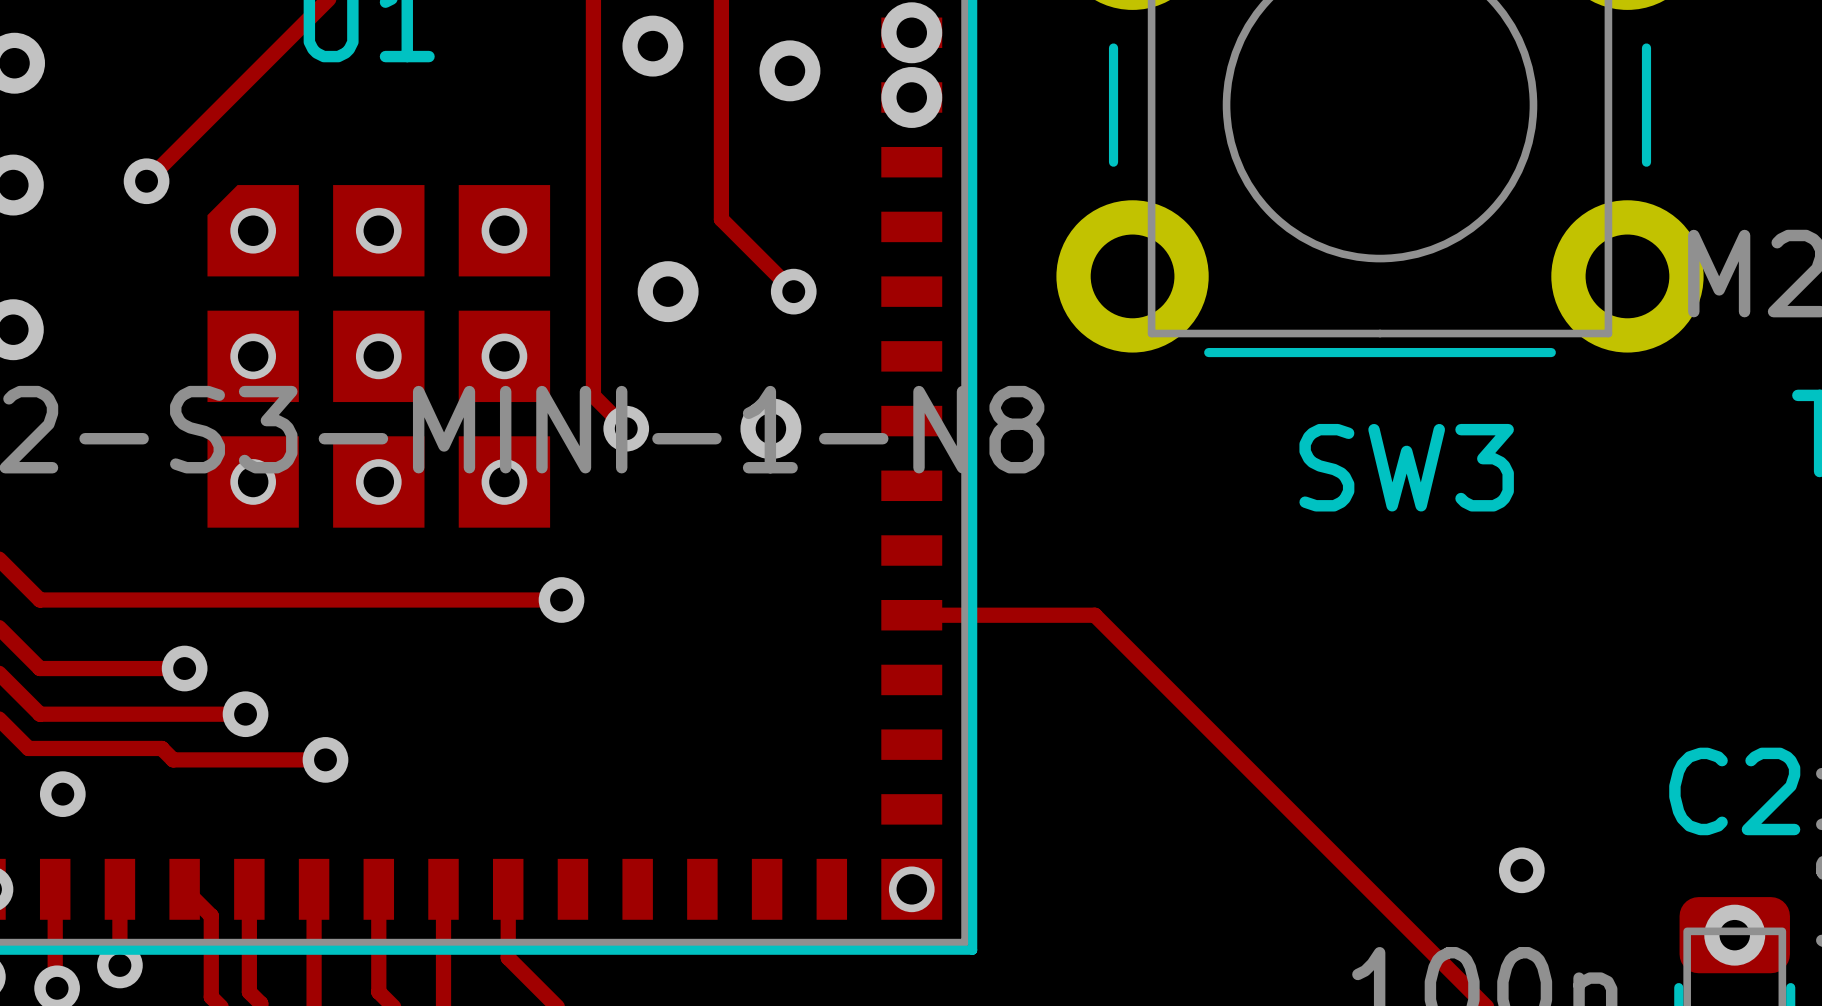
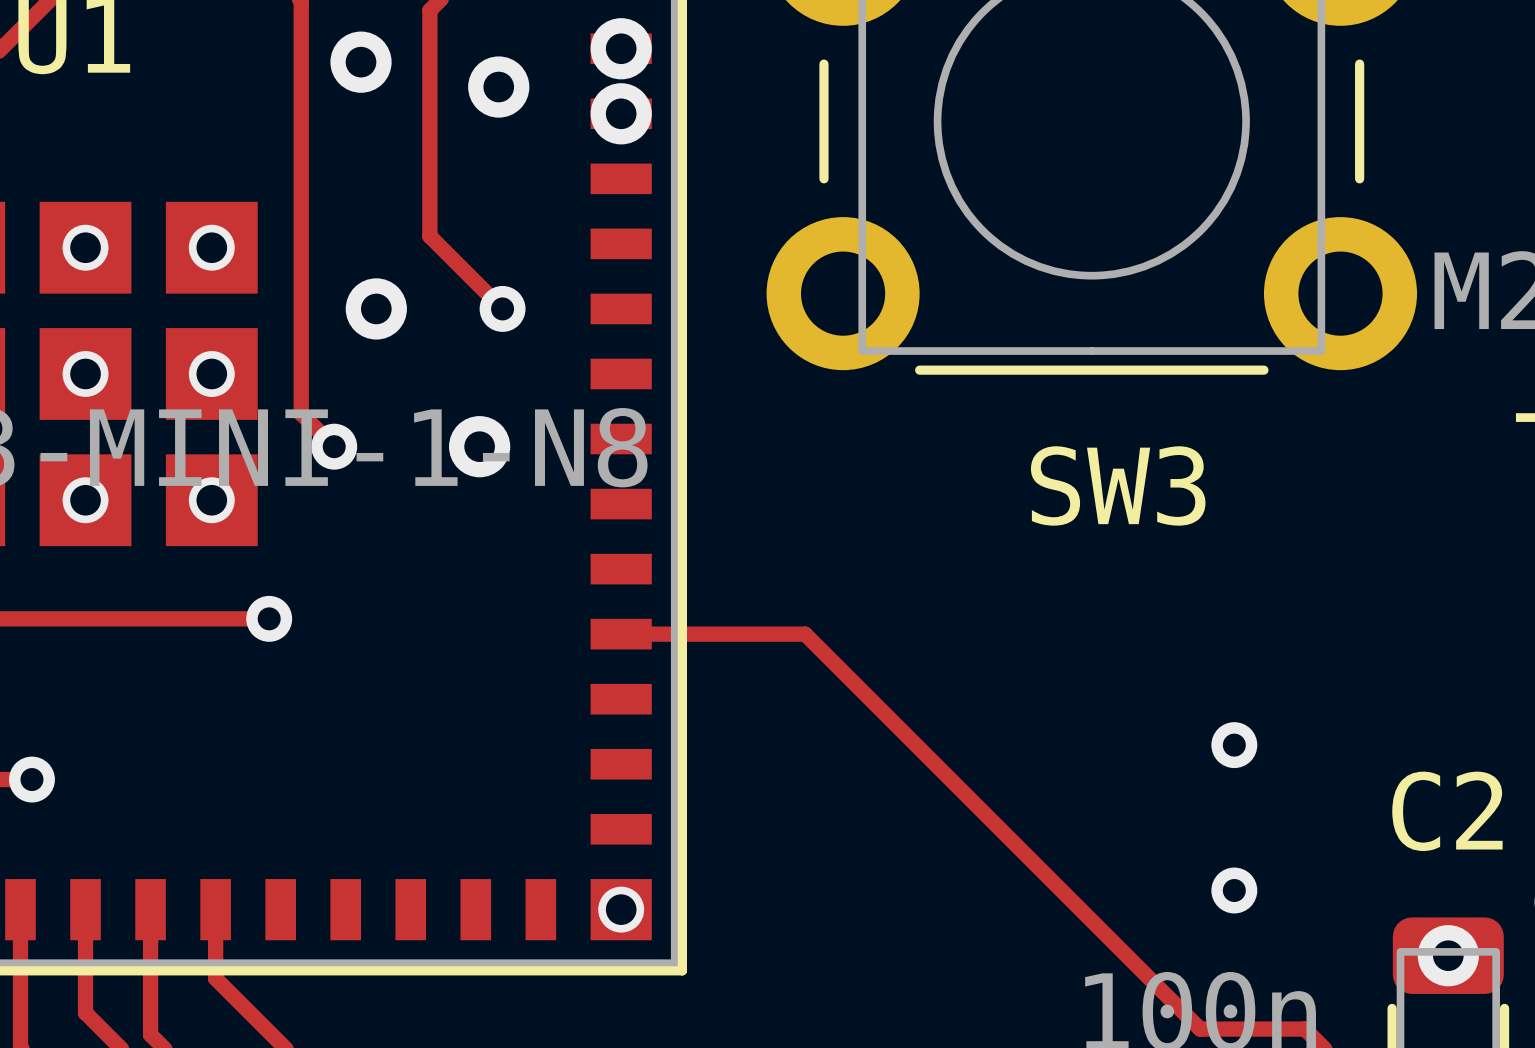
via: none -> (1234, 745)

